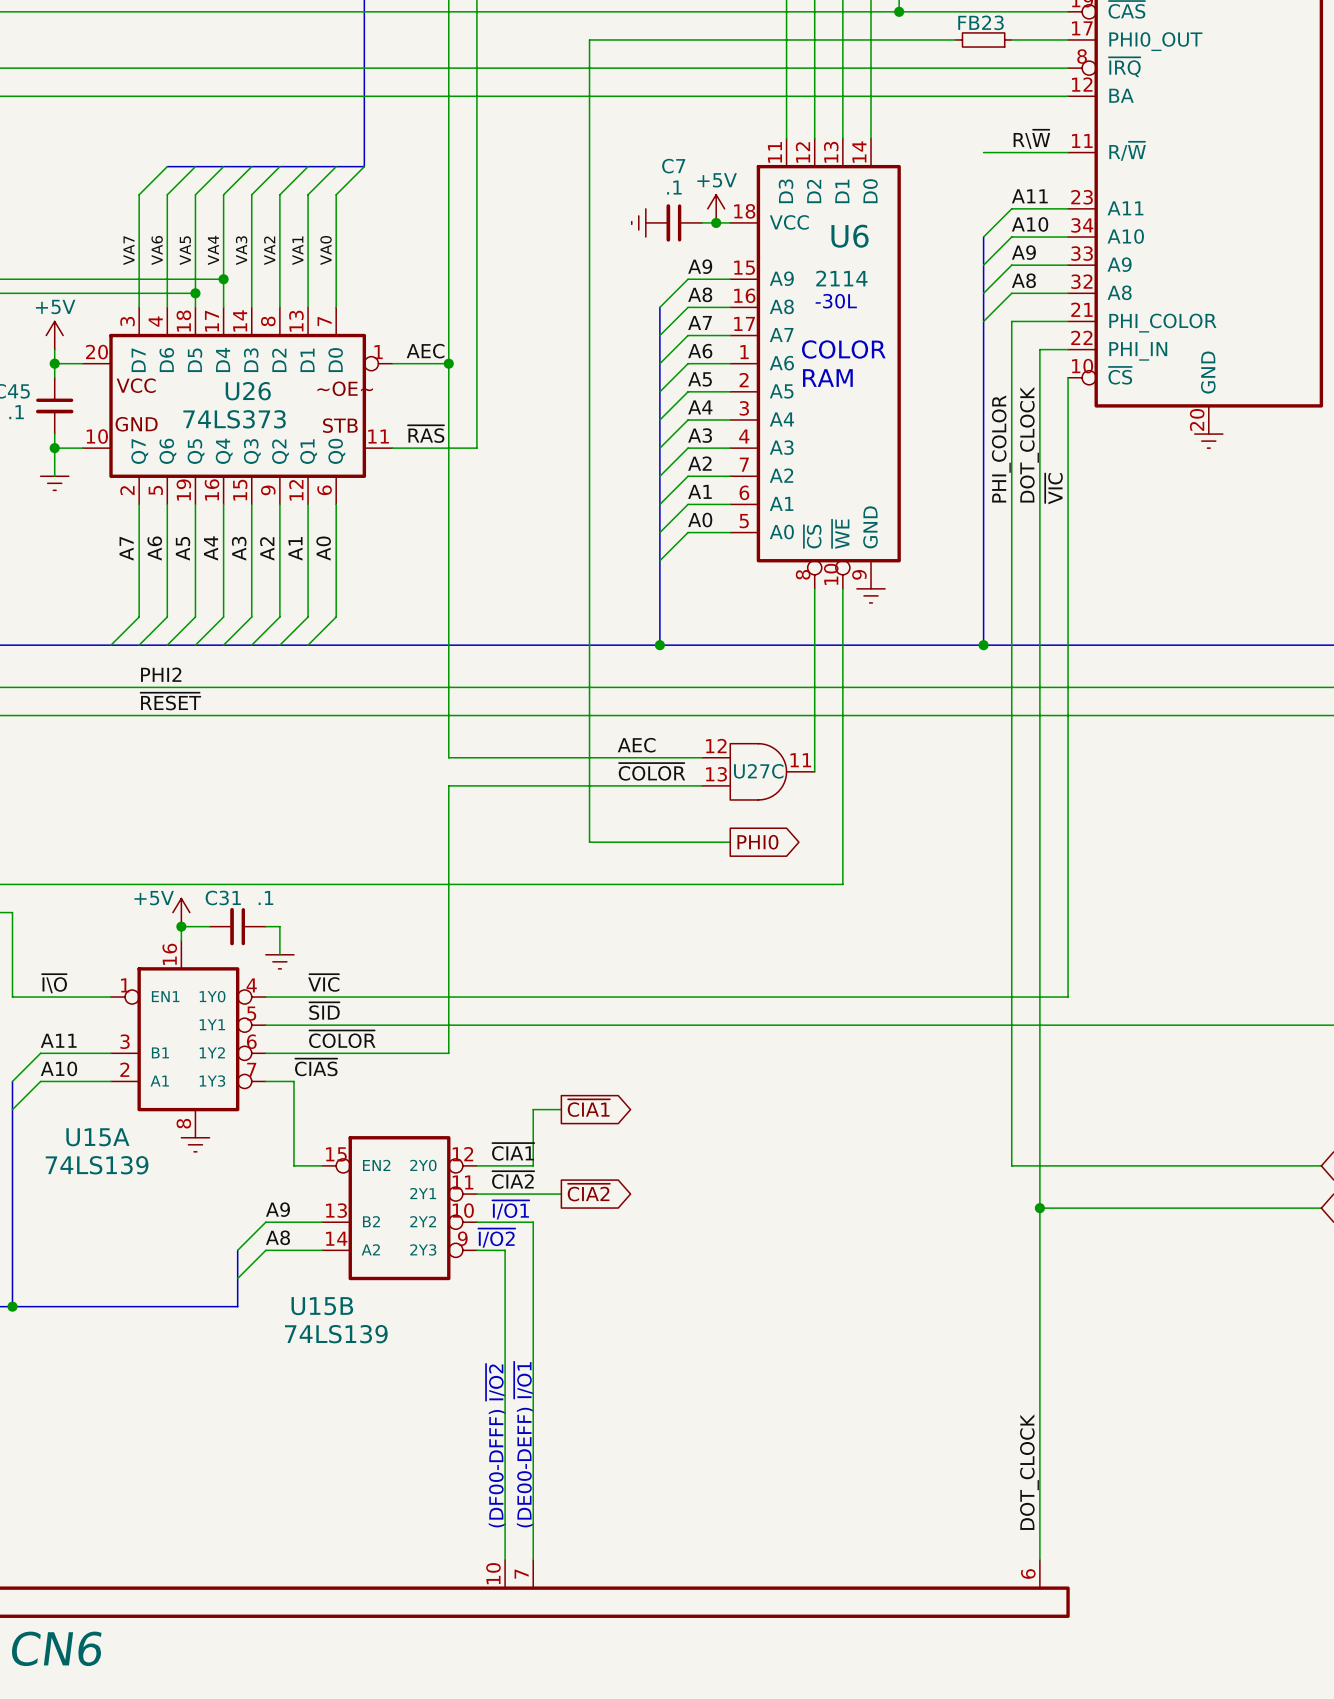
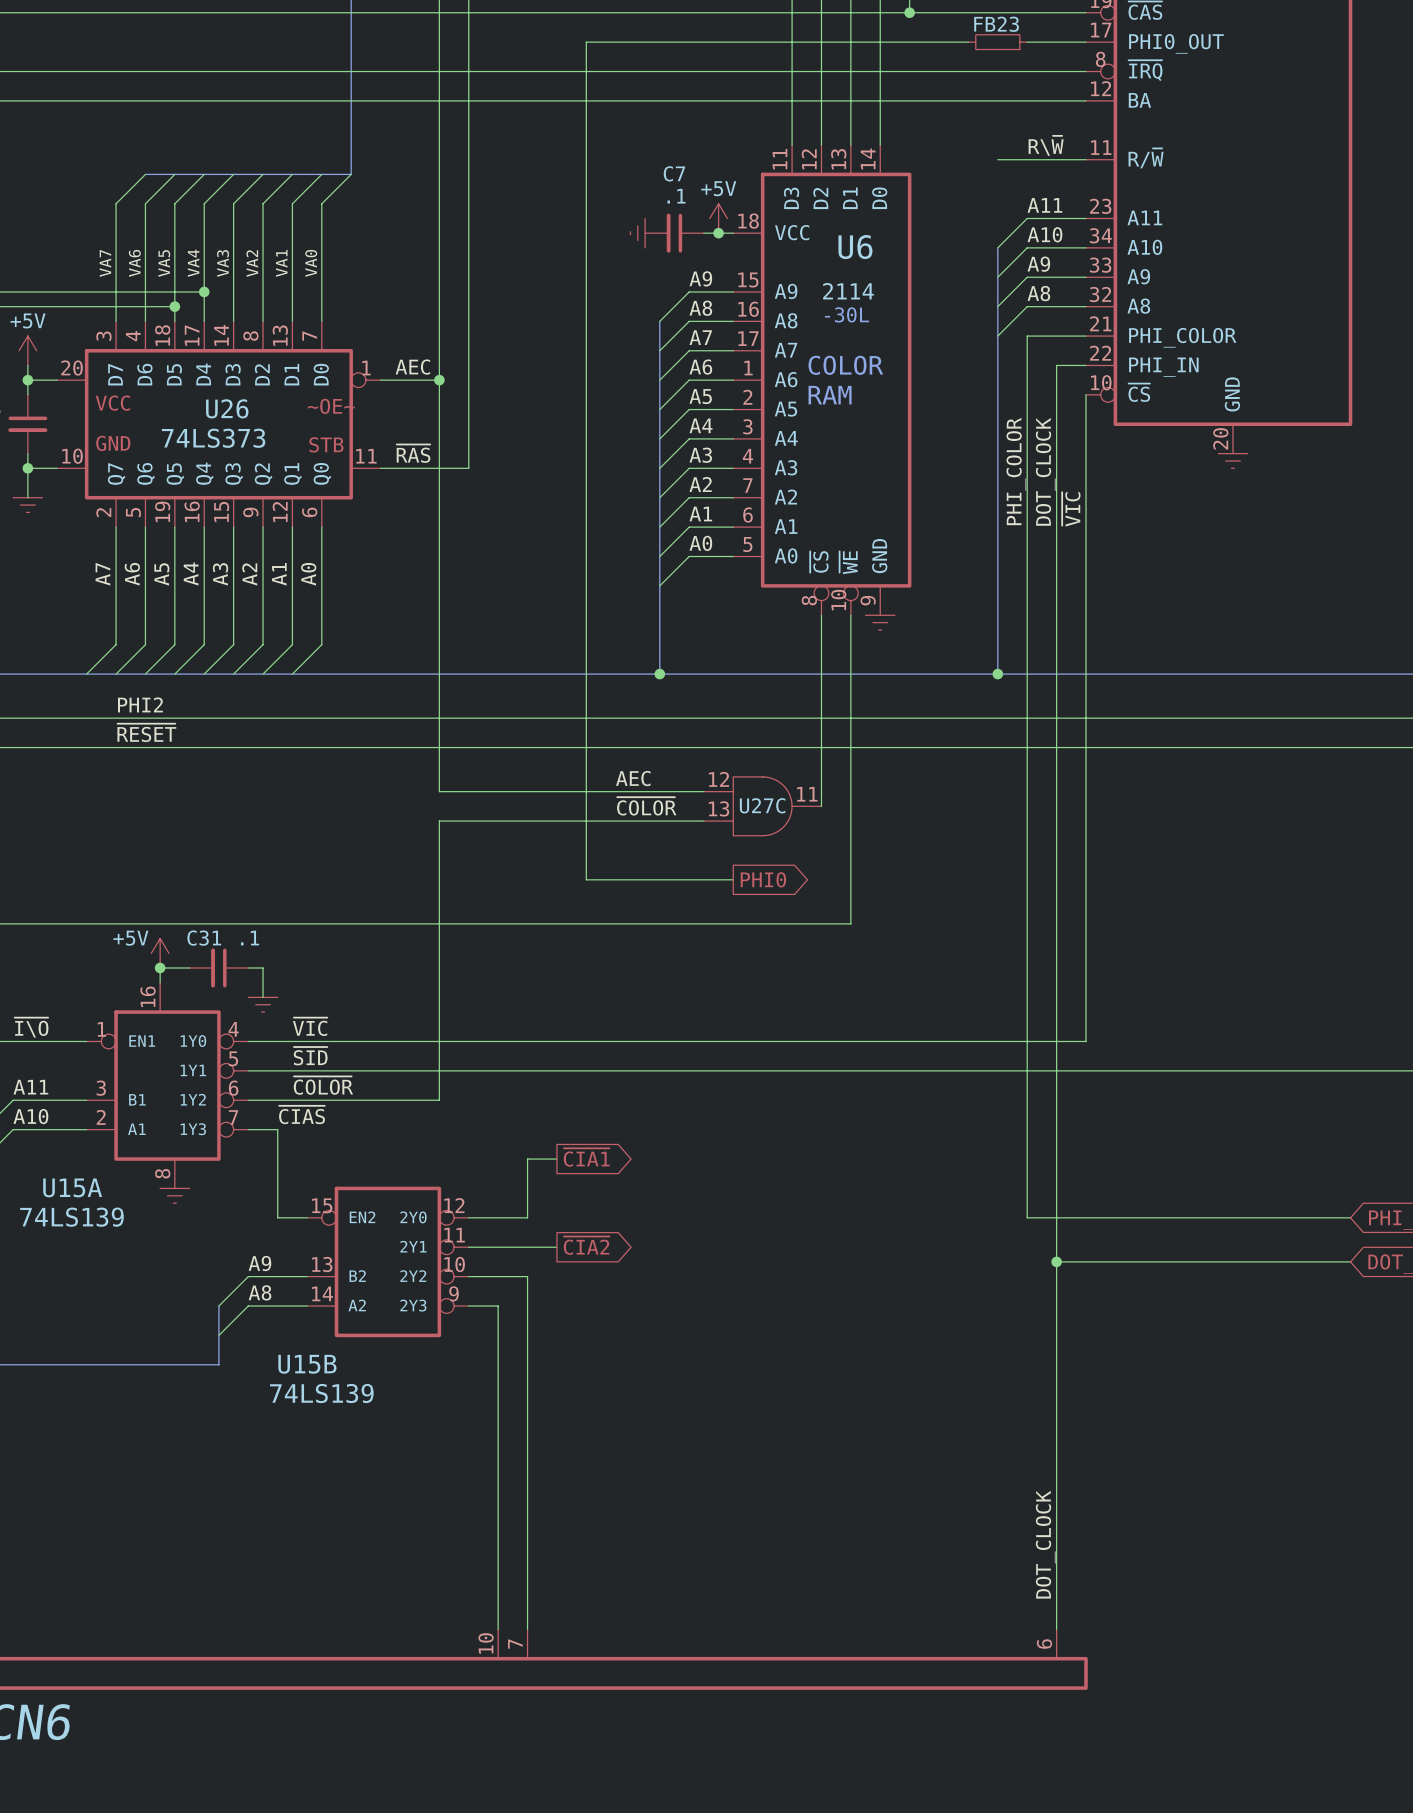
label: ~{CIA1} (513, 1151) -> none
label: ~{CIA2} (513, 1180) -> none
text: ~{I/O1} (510, 1209) -> none
text: ~{I/O2} (496, 1238) -> none
text: (DE00-DEFF) ~{I/O1} (524, 1444) -> none
text: (DF00-DFFF) ~{I/O2} (495, 1445) -> none

